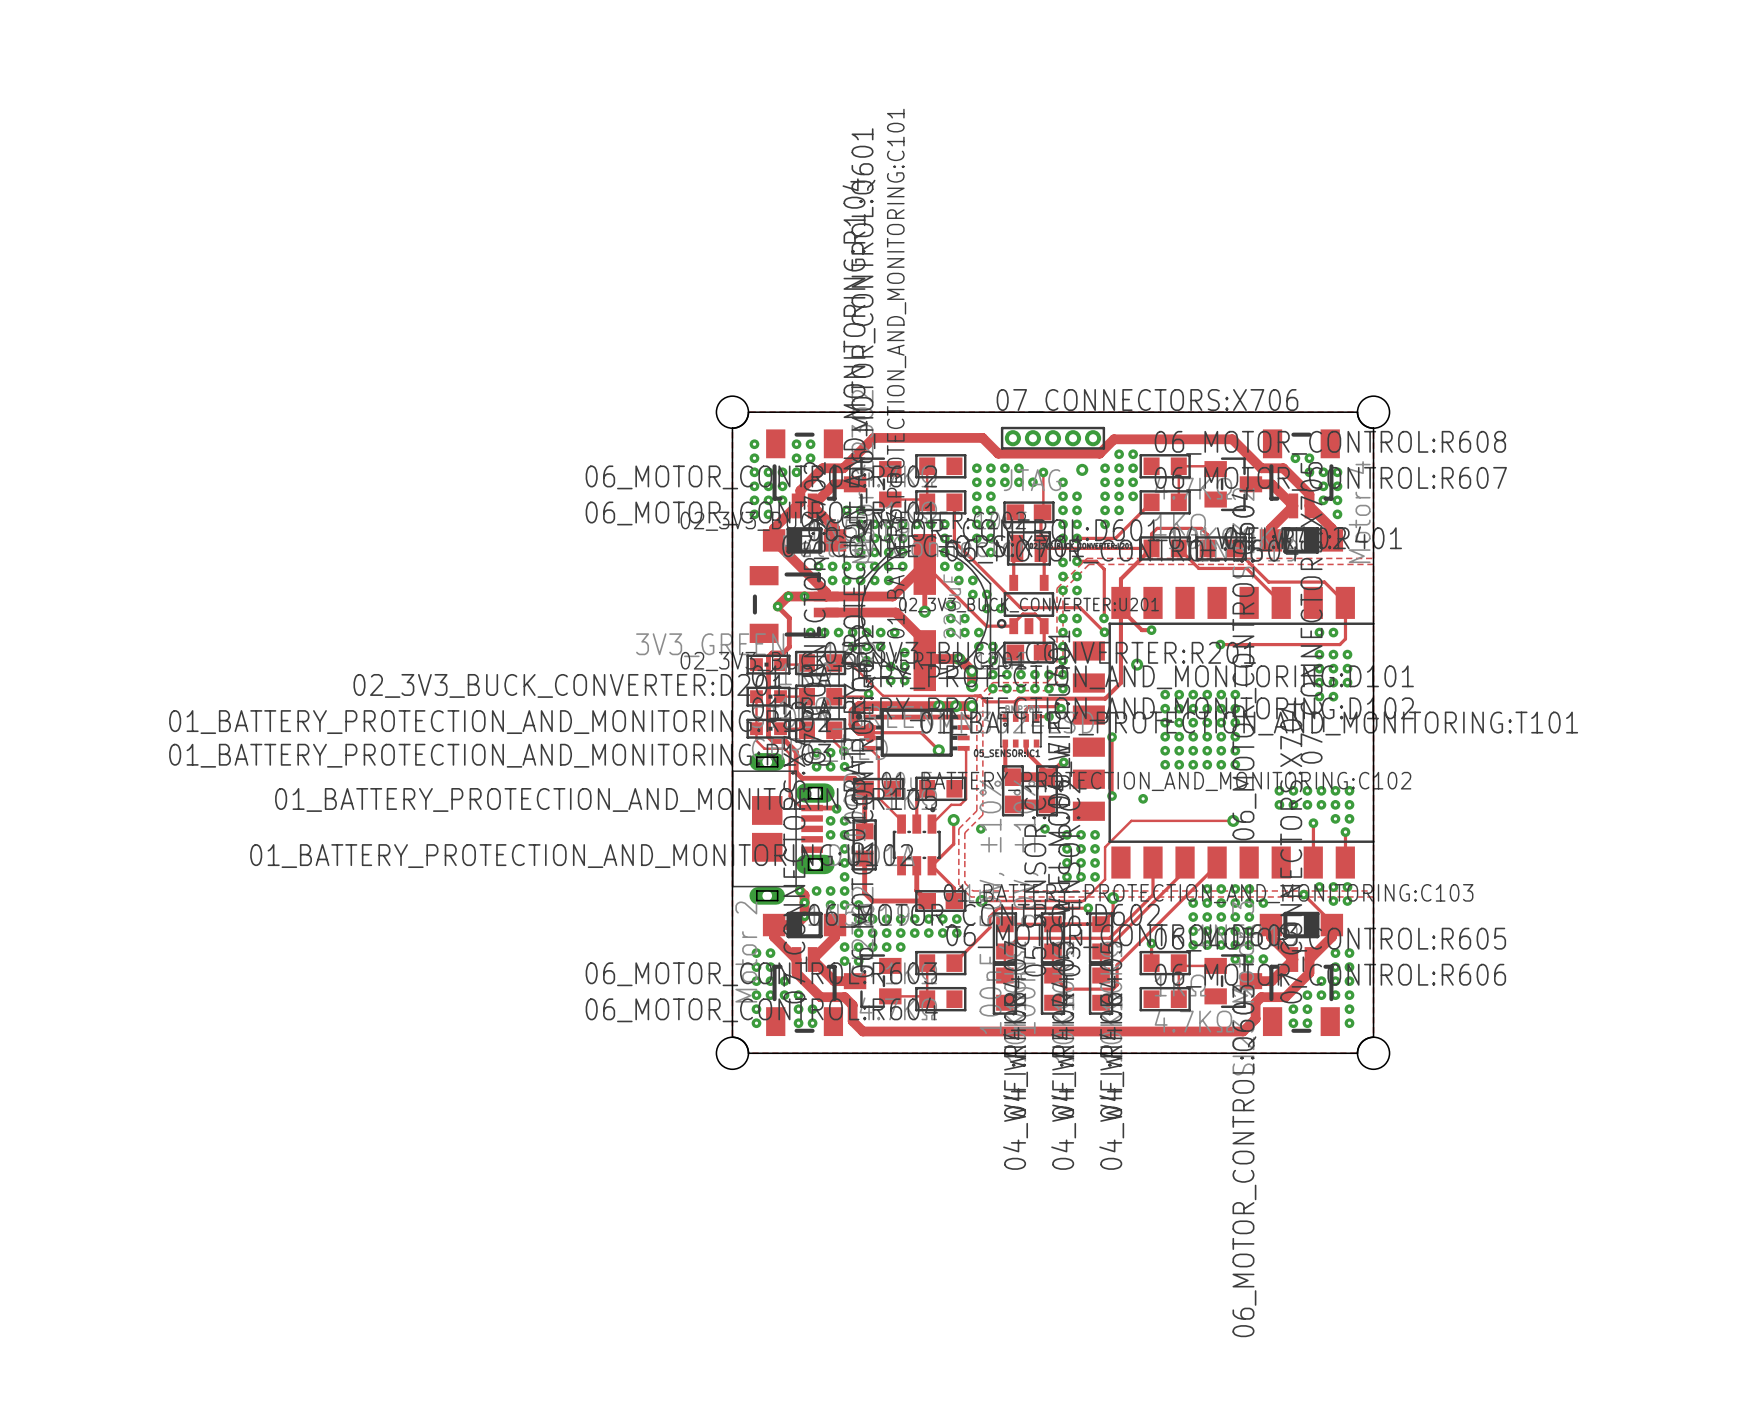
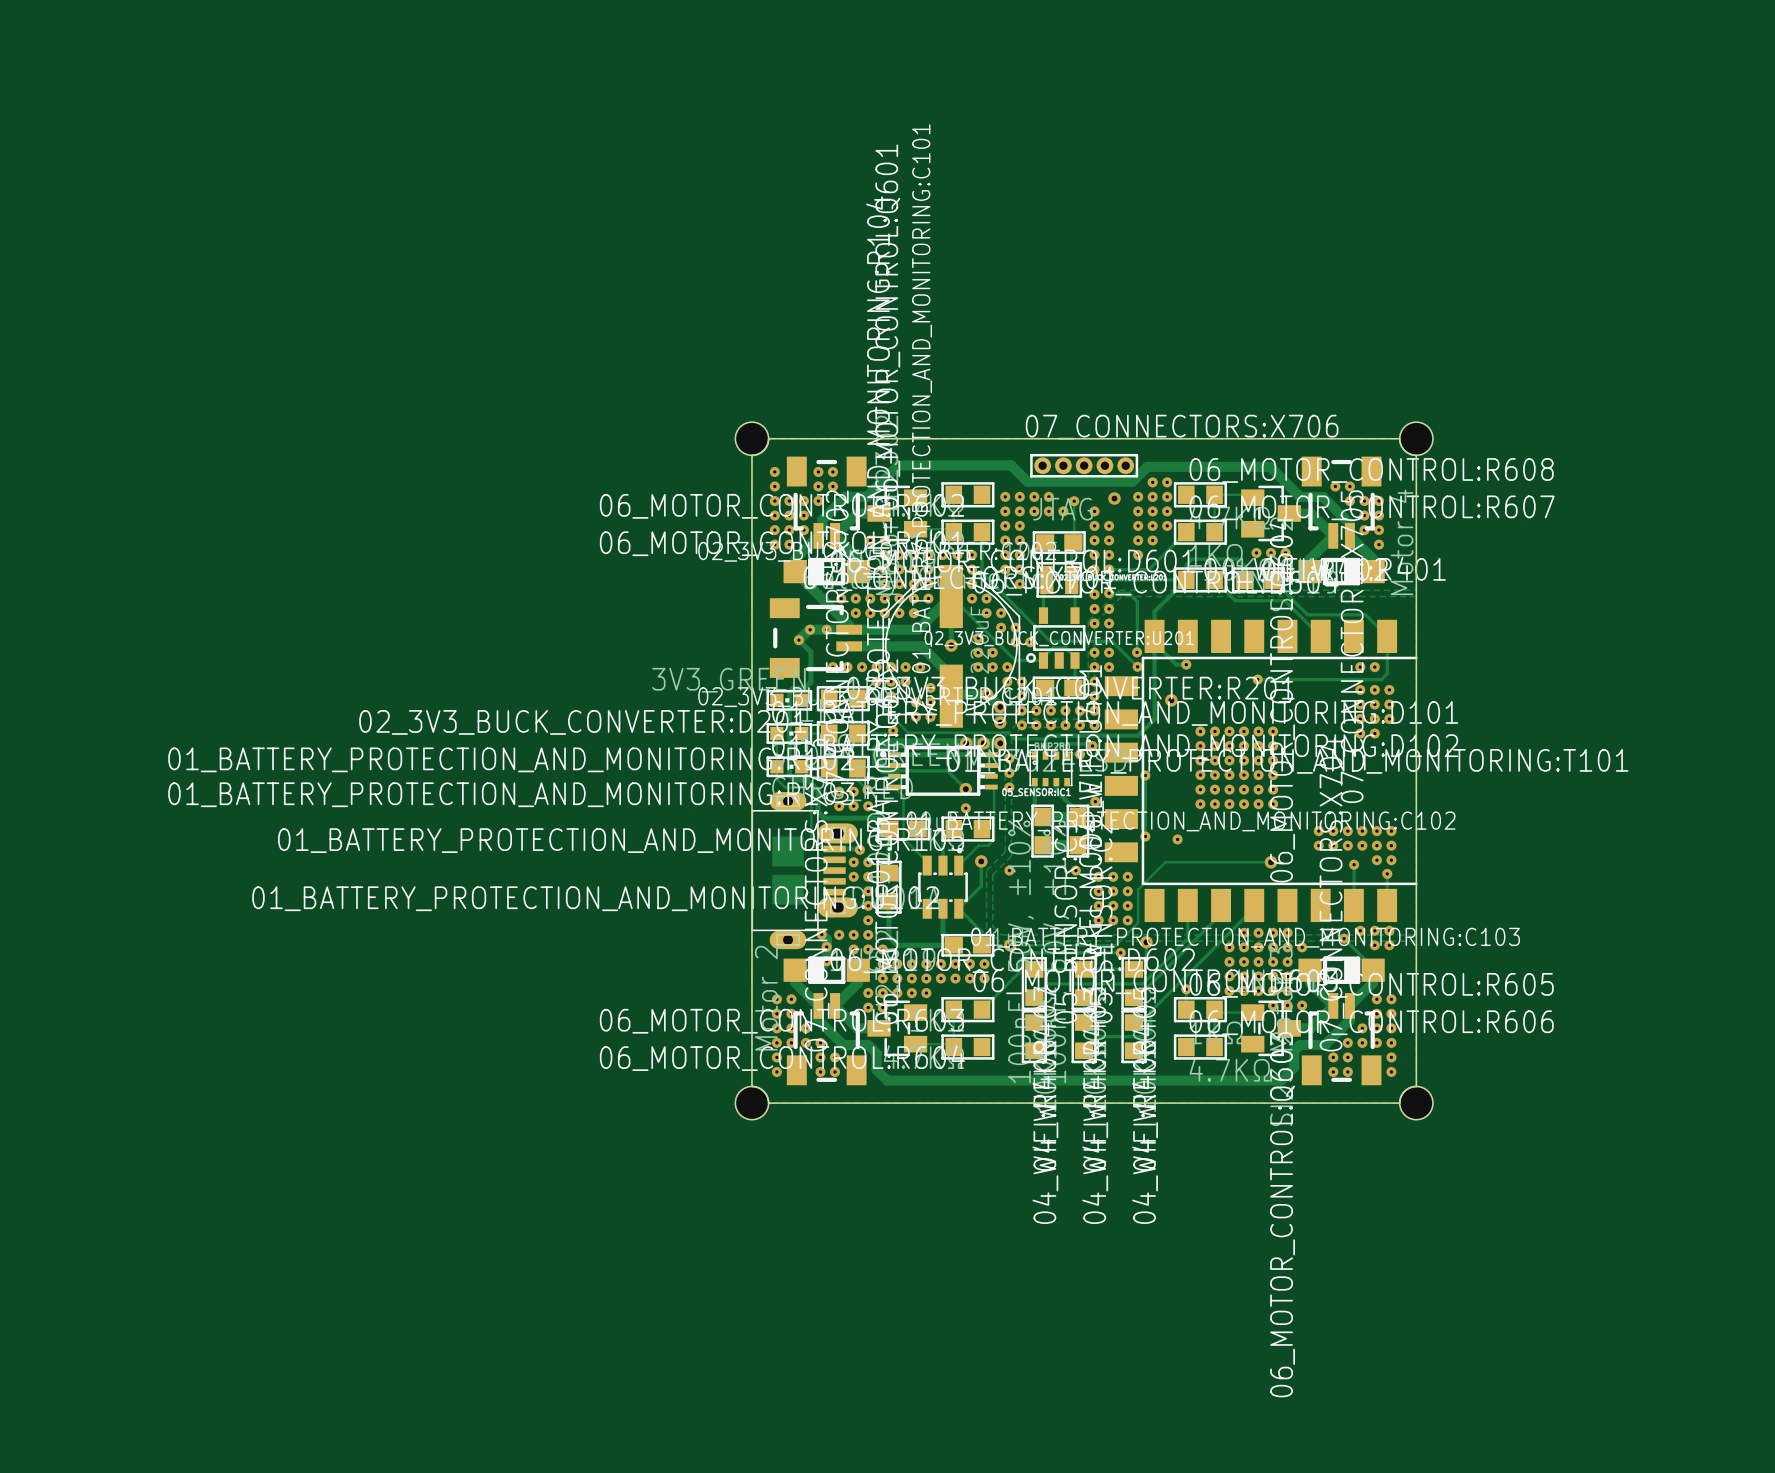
via: none -> (1256, 552)
via: none -> (1271, 552)
via: none -> (1285, 552)
via: none -> (1009, 758)
via: none -> (1009, 773)
via: none -> (1009, 787)
via: none -> (965, 808)

